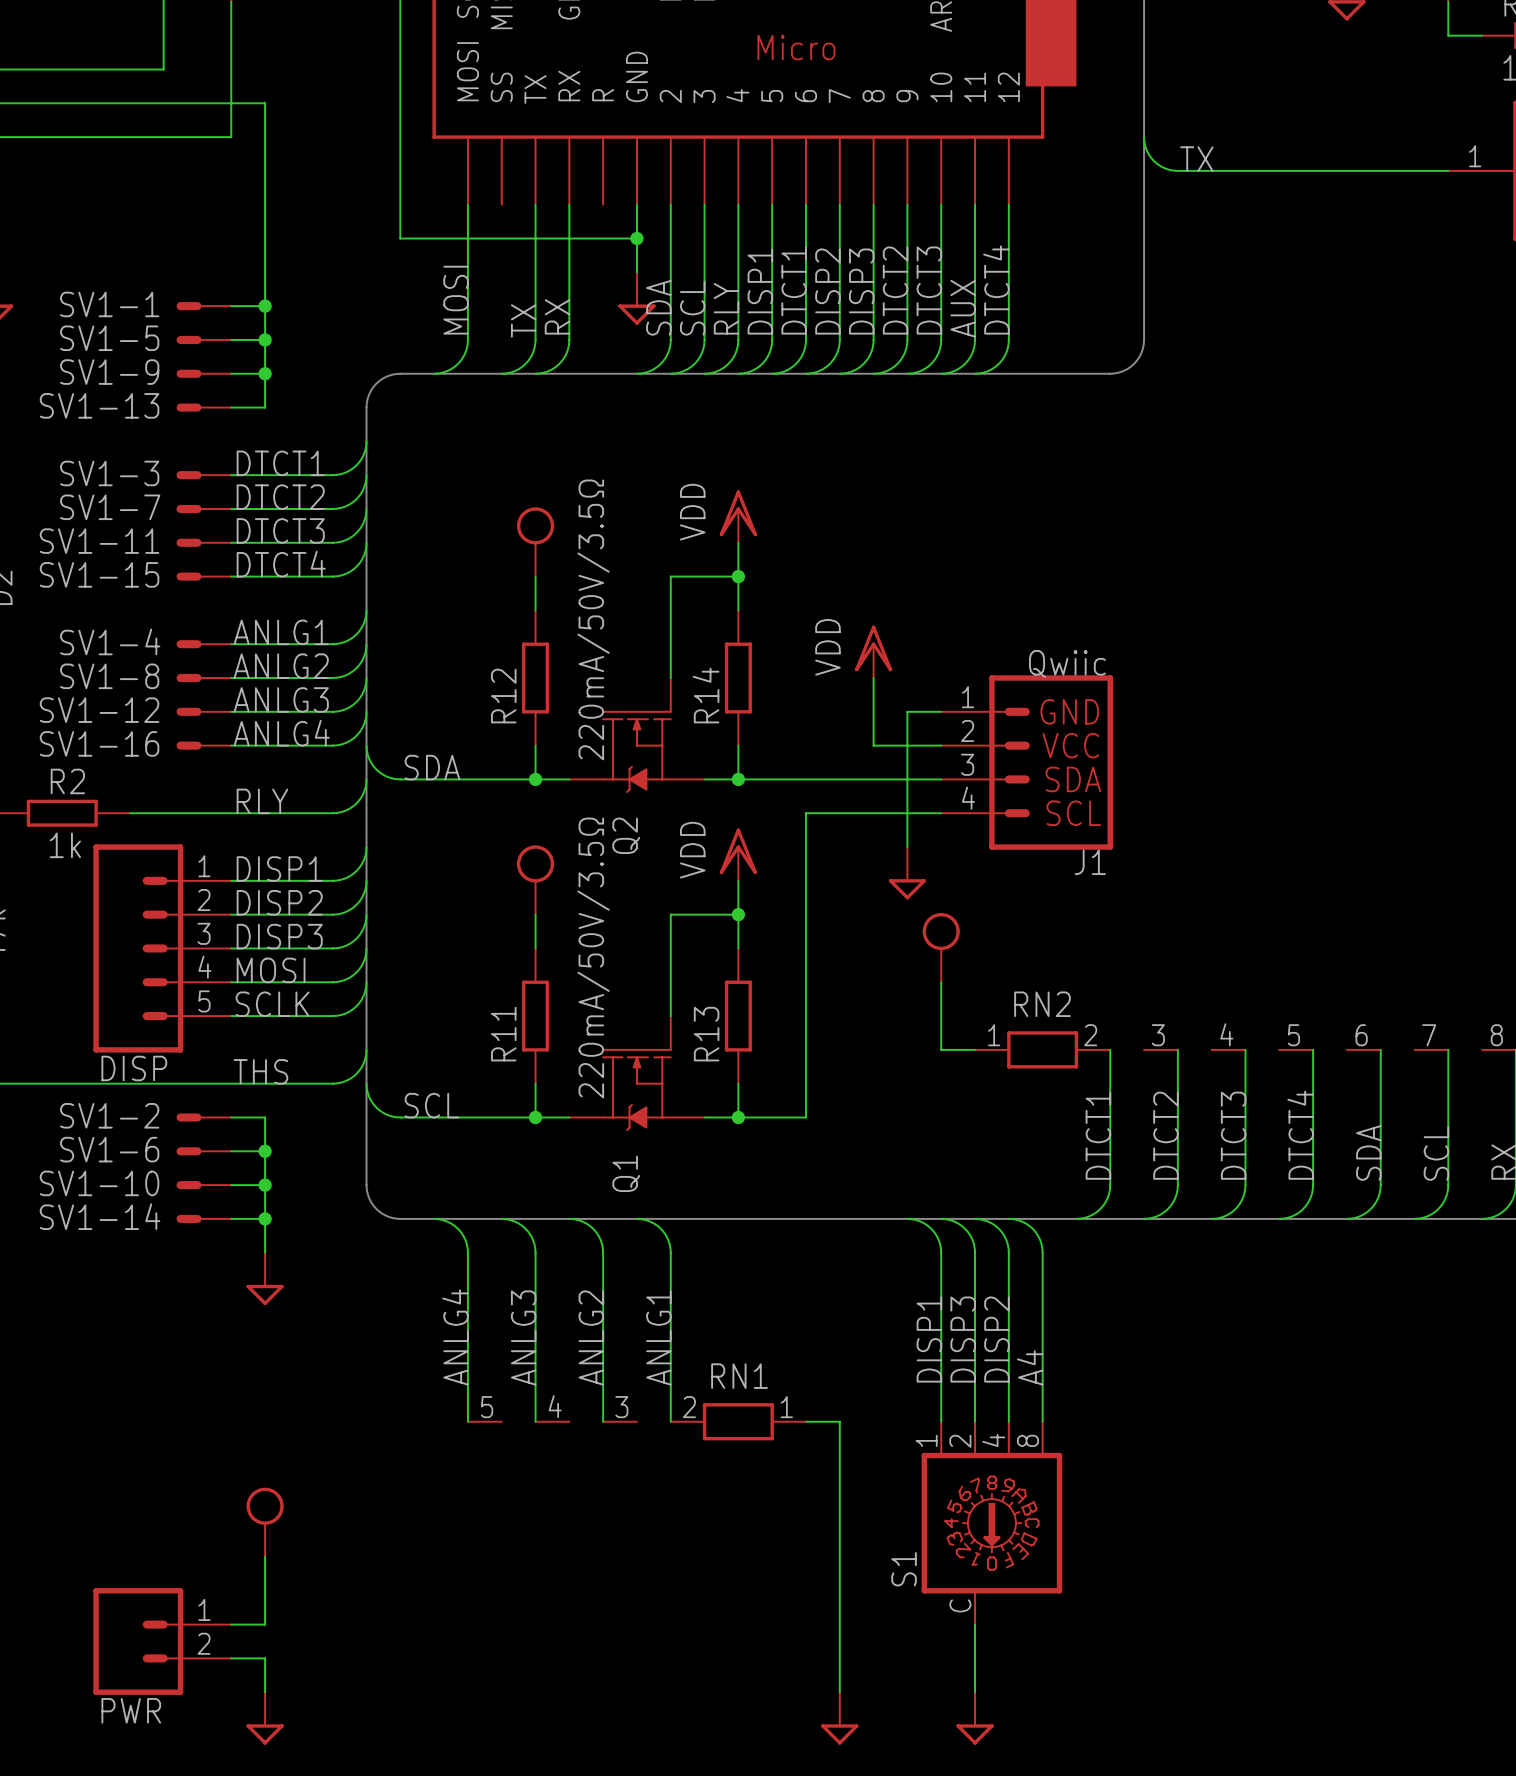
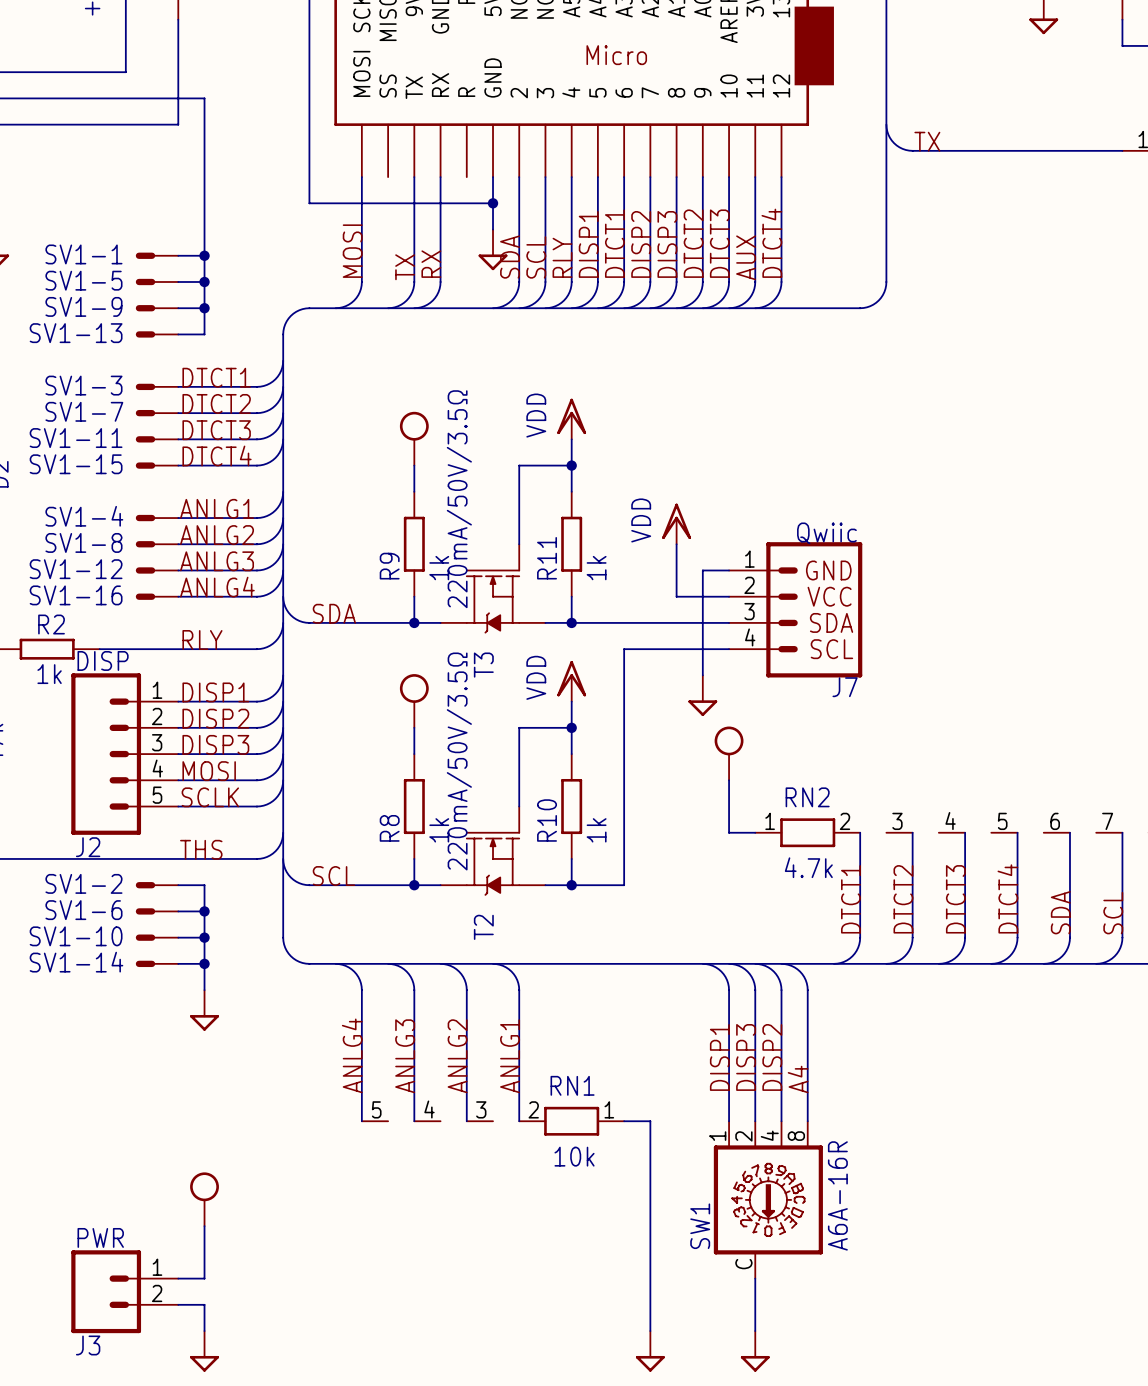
R14 name: R14 (706, 695) -> R11 (547, 558)
R12 name: R12 (503, 696) -> R9 (389, 566)
R12 value: none -> 1k (439, 568)
R14 value: none -> 1k (596, 568)
DISP value: none -> DISP (103, 660)
Q2 name: Q2 (626, 835) -> T3 (483, 665)
J1 name: J1 (1090, 862) -> J7 (845, 687)
R11 name: R11 (503, 1034) -> R8 (389, 828)
R13 name: R13 (706, 1034) -> R10 (547, 820)
R11 value: none -> 1k (439, 830)
R13 value: none -> 1k (596, 830)
DISP name: DISP (134, 1068) -> J2 (88, 847)
RN2 value: none -> 4.7k (808, 867)
Q1 name: Q1 (626, 1173) -> T2 (483, 927)
RN1 value: none -> 10k (574, 1156)
S1 value: none -> A6A-16R (837, 1195)
S1 name: S1 (904, 1569) -> SW1 (700, 1226)
PWR value: none -> PWR (100, 1237)
PWR name: PWR (131, 1710) -> J3 (88, 1345)

